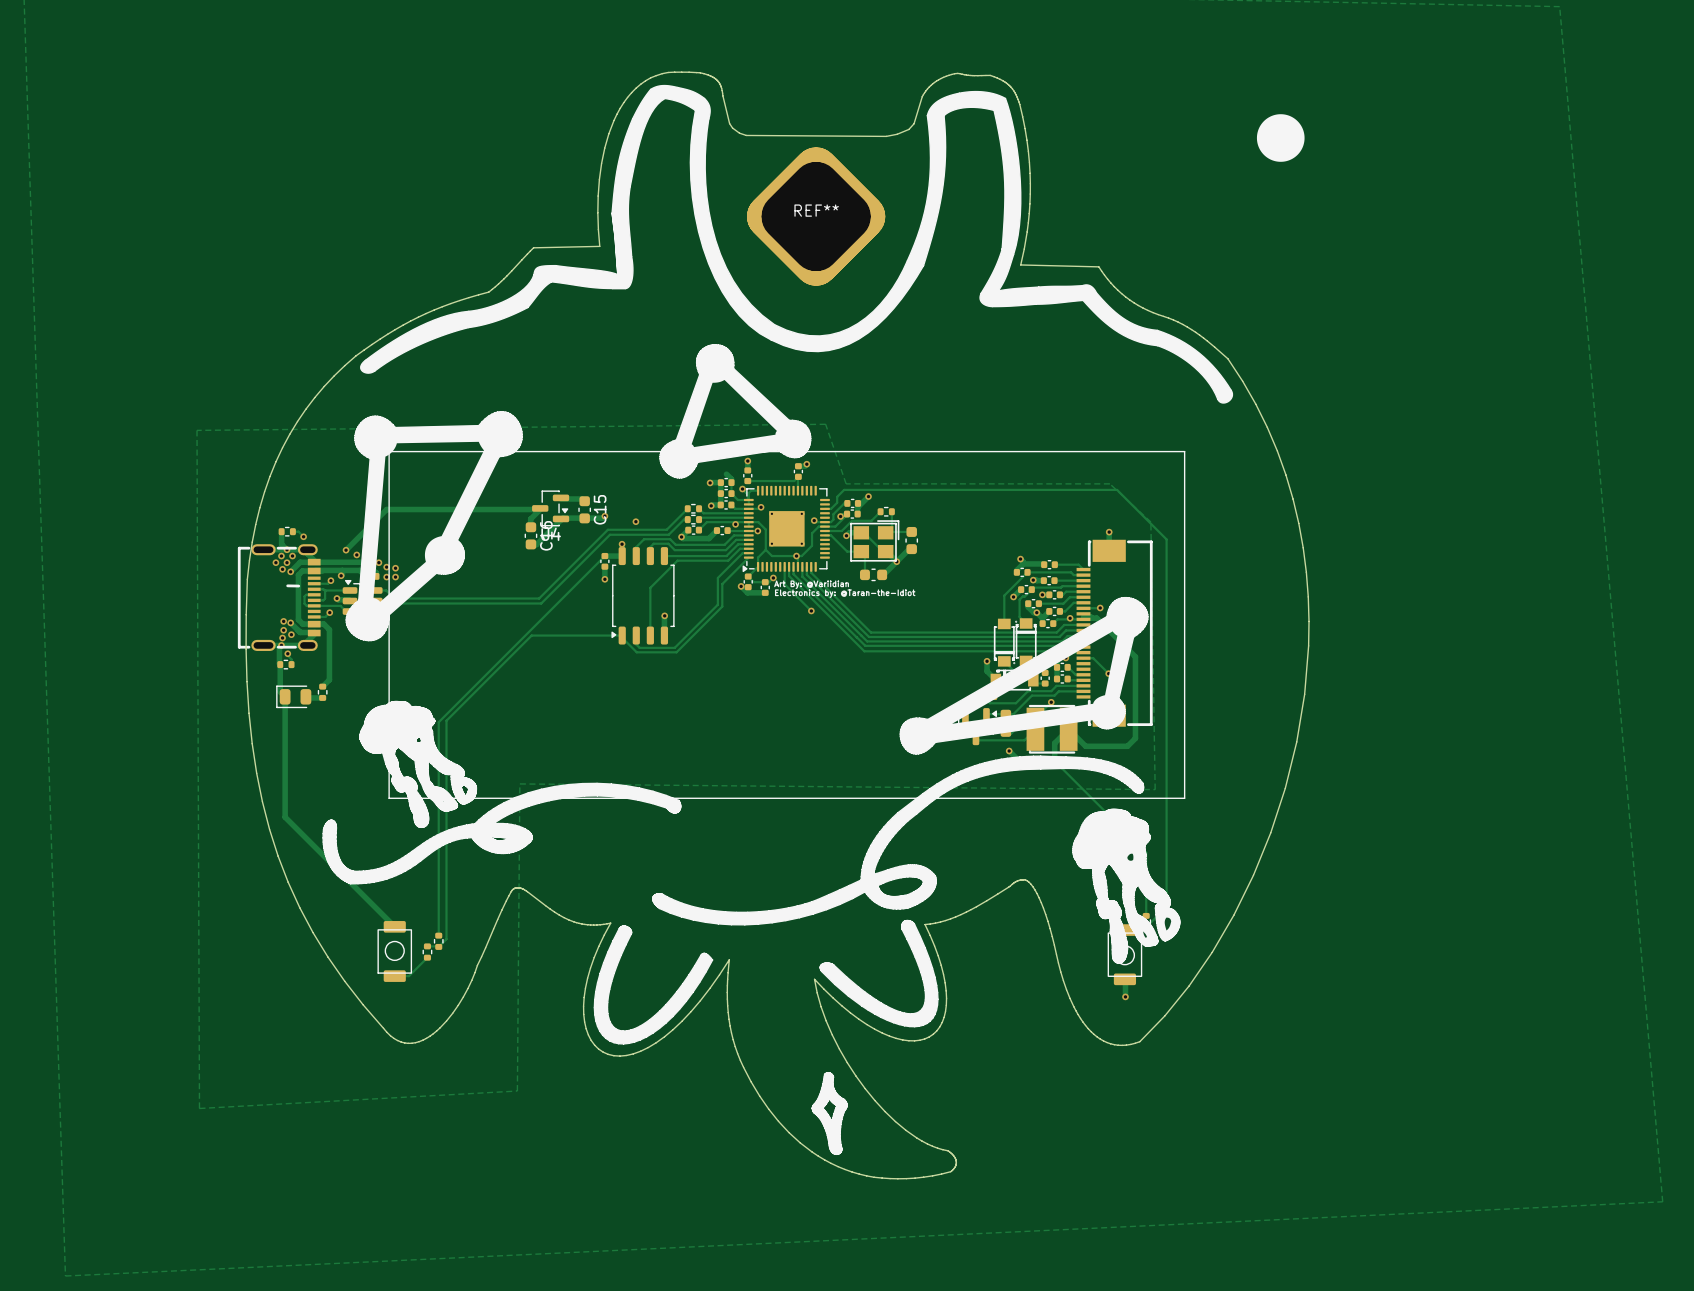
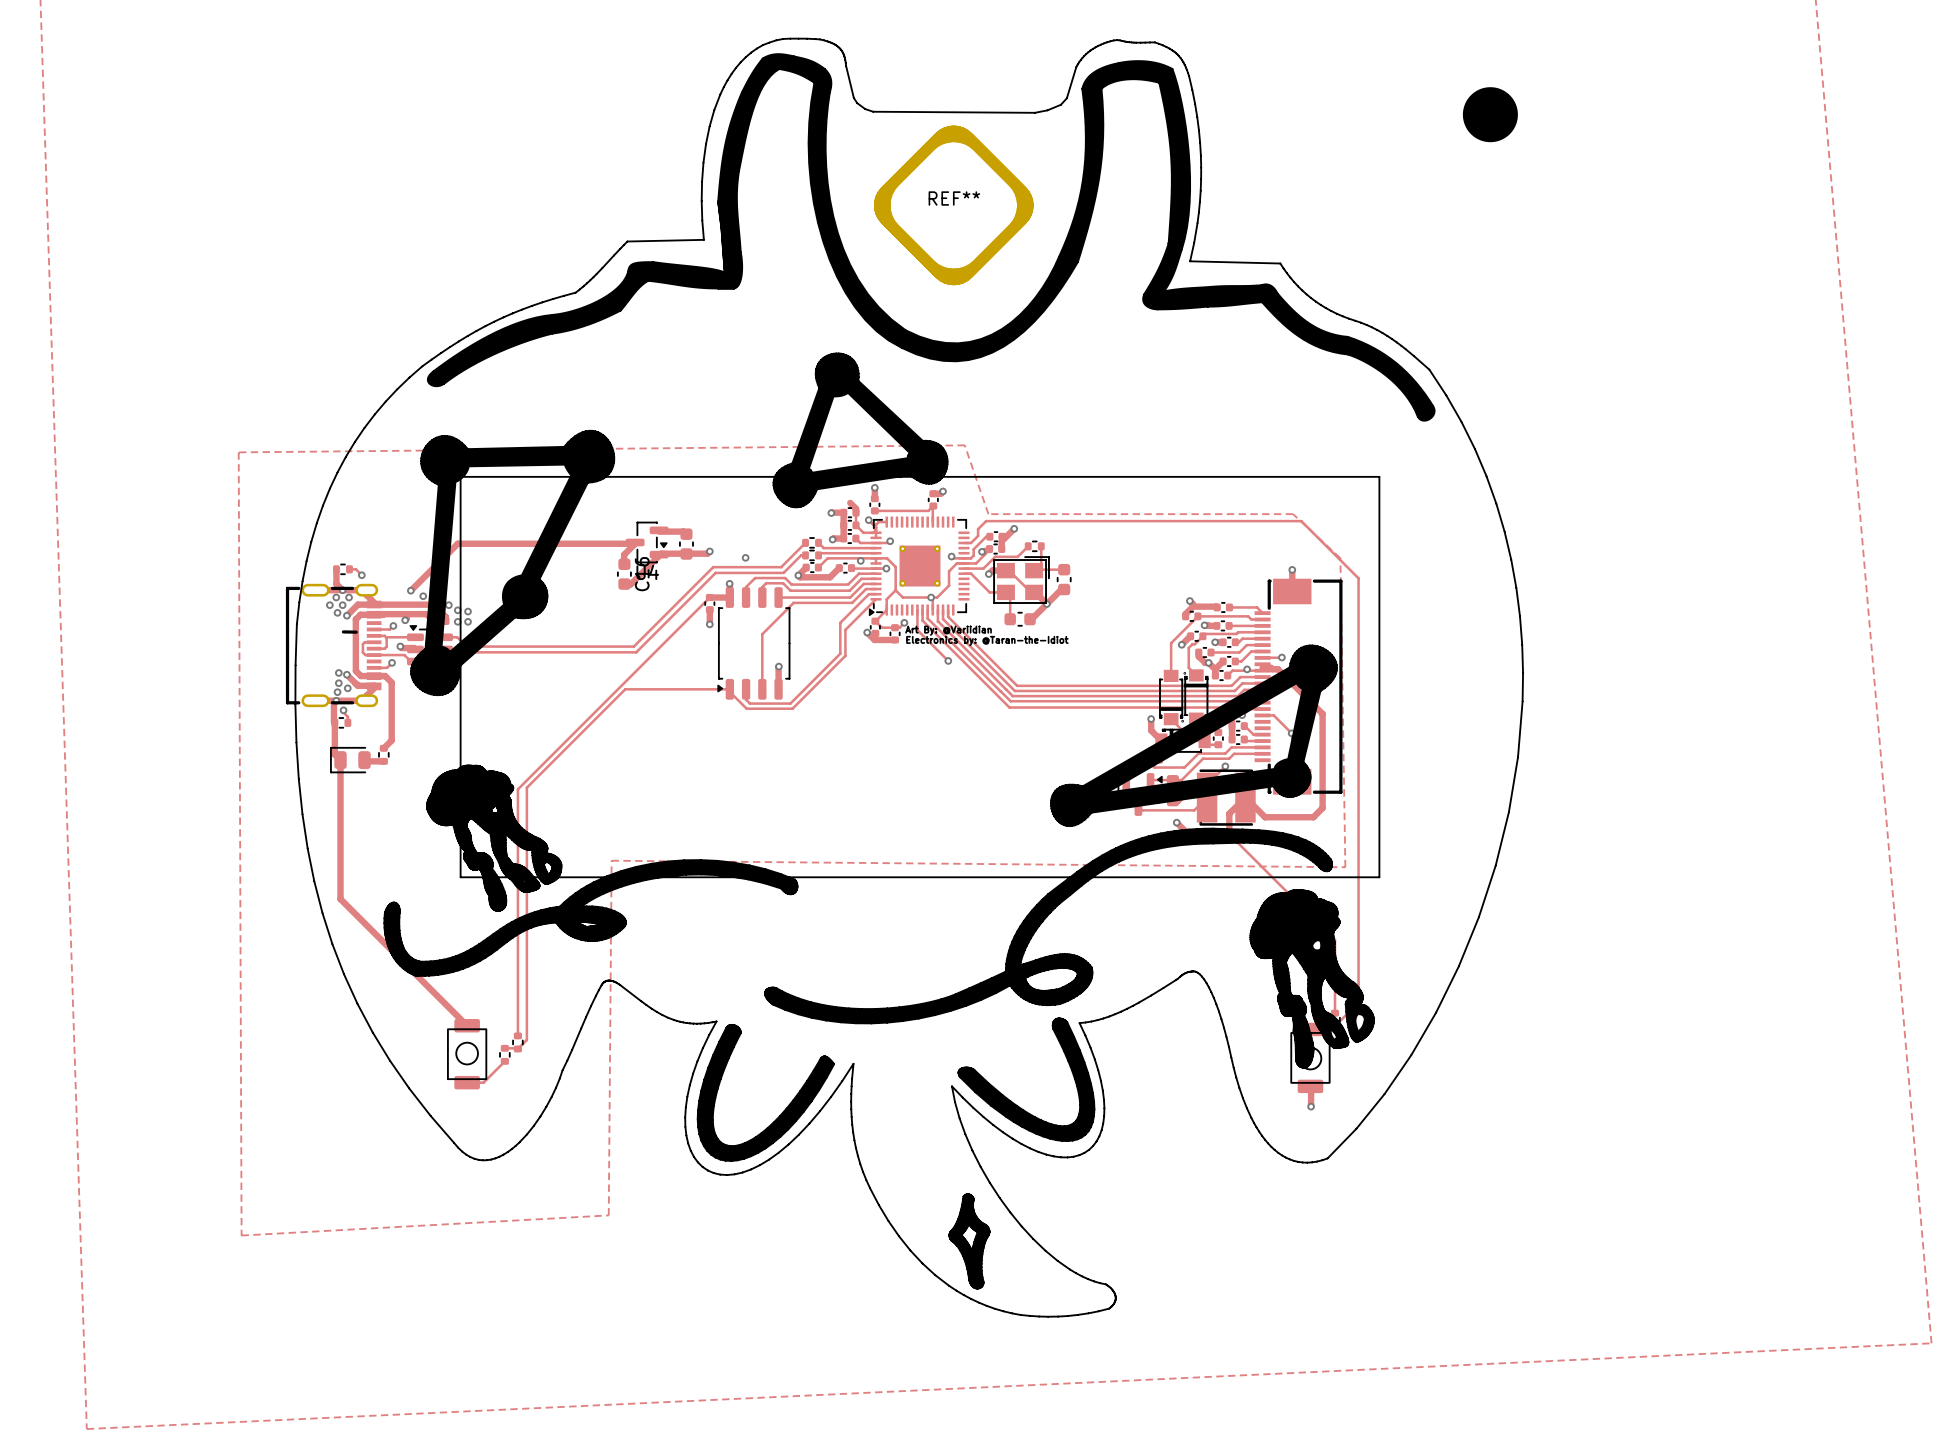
C15 name: C15 (600, 509) -> none

